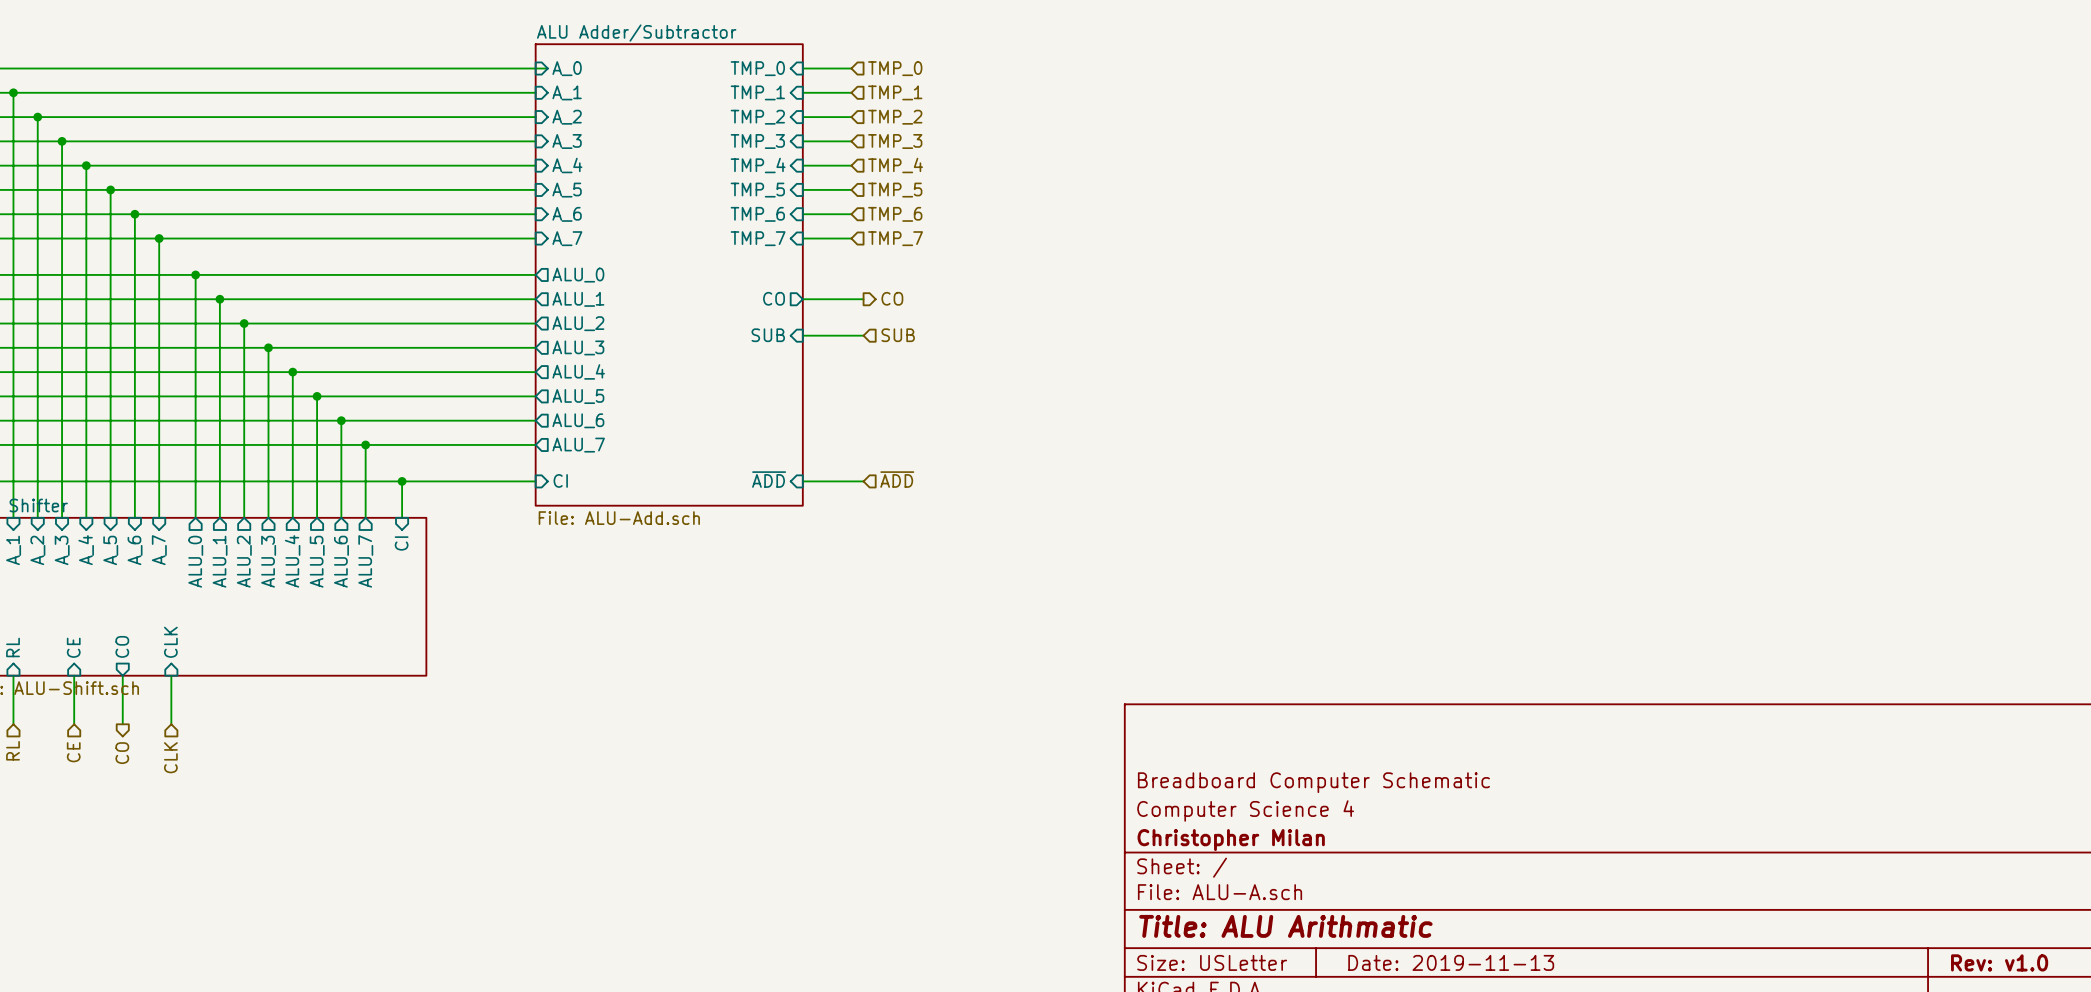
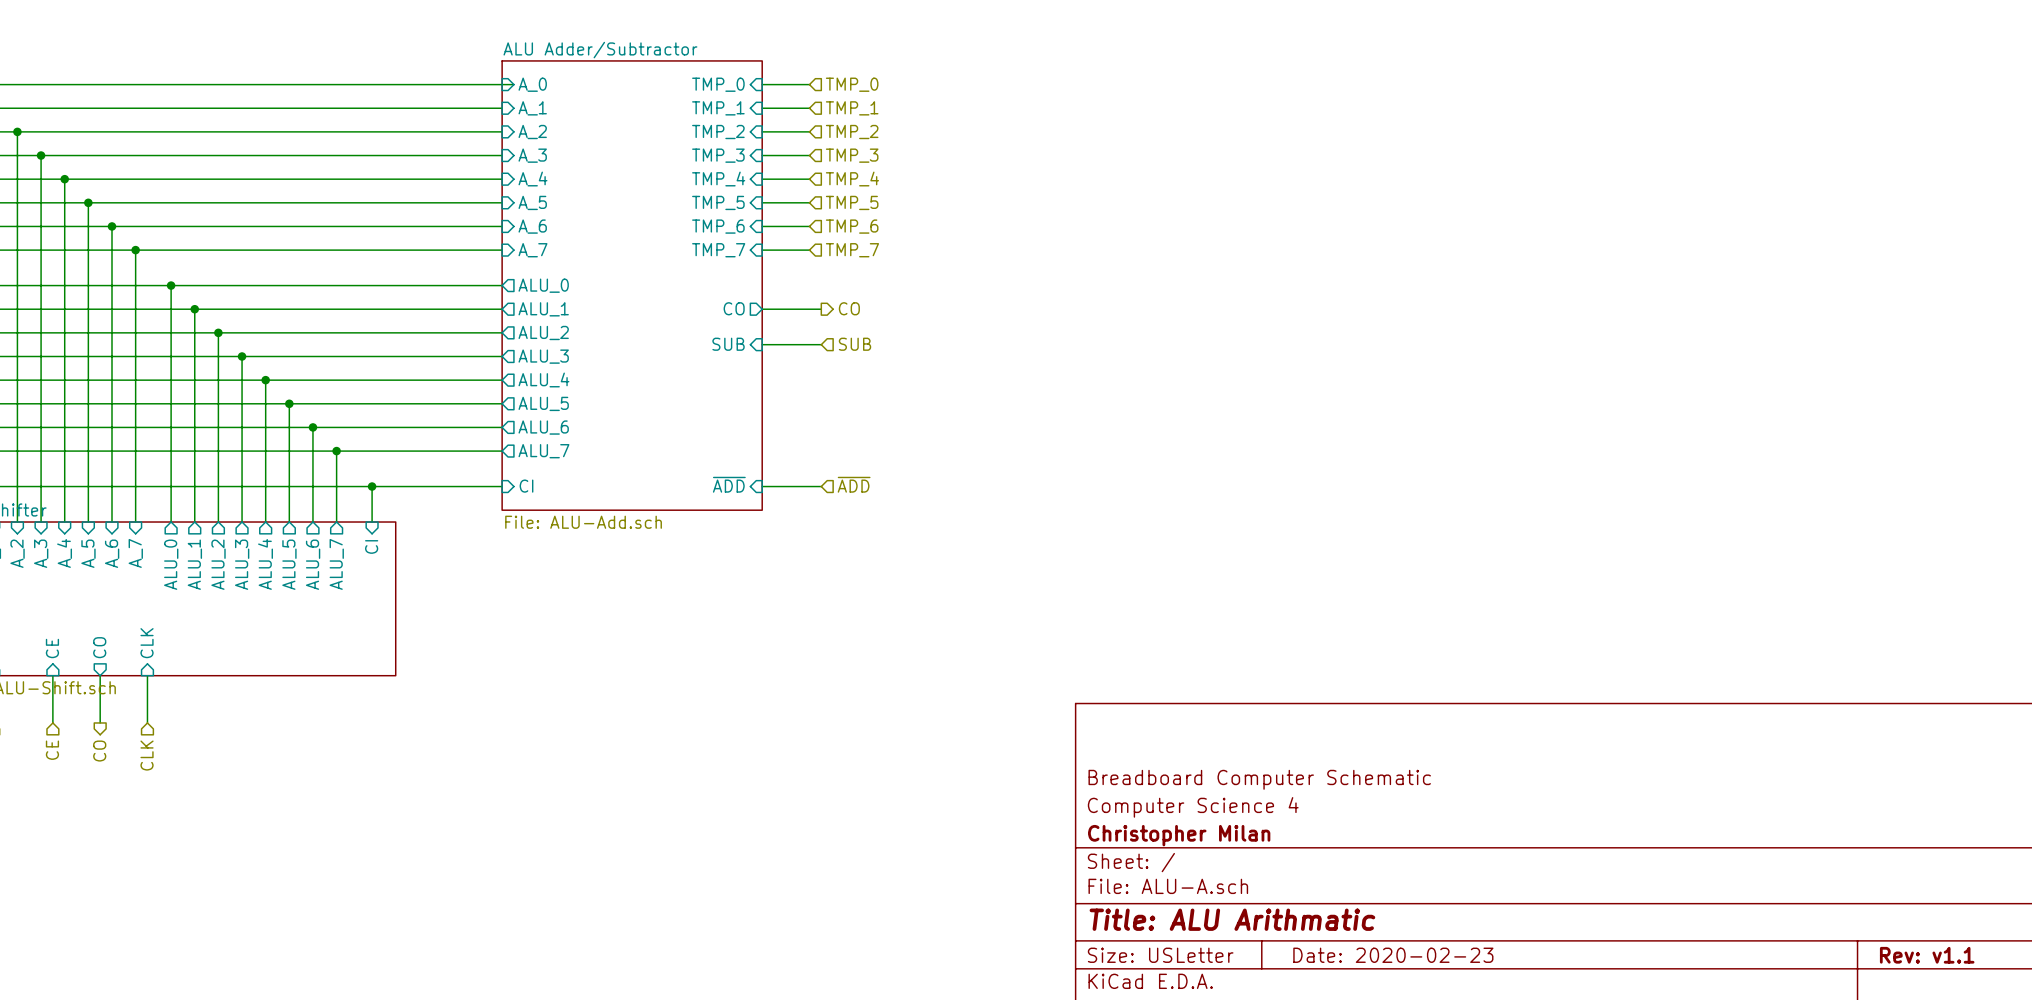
title block: Date: 2019-11-13 (1451, 962) -> Date: 2020-02-23 (1393, 955)
title block: Rev: v1.0 (1999, 962) -> Rev: v1.1 (1927, 955)

